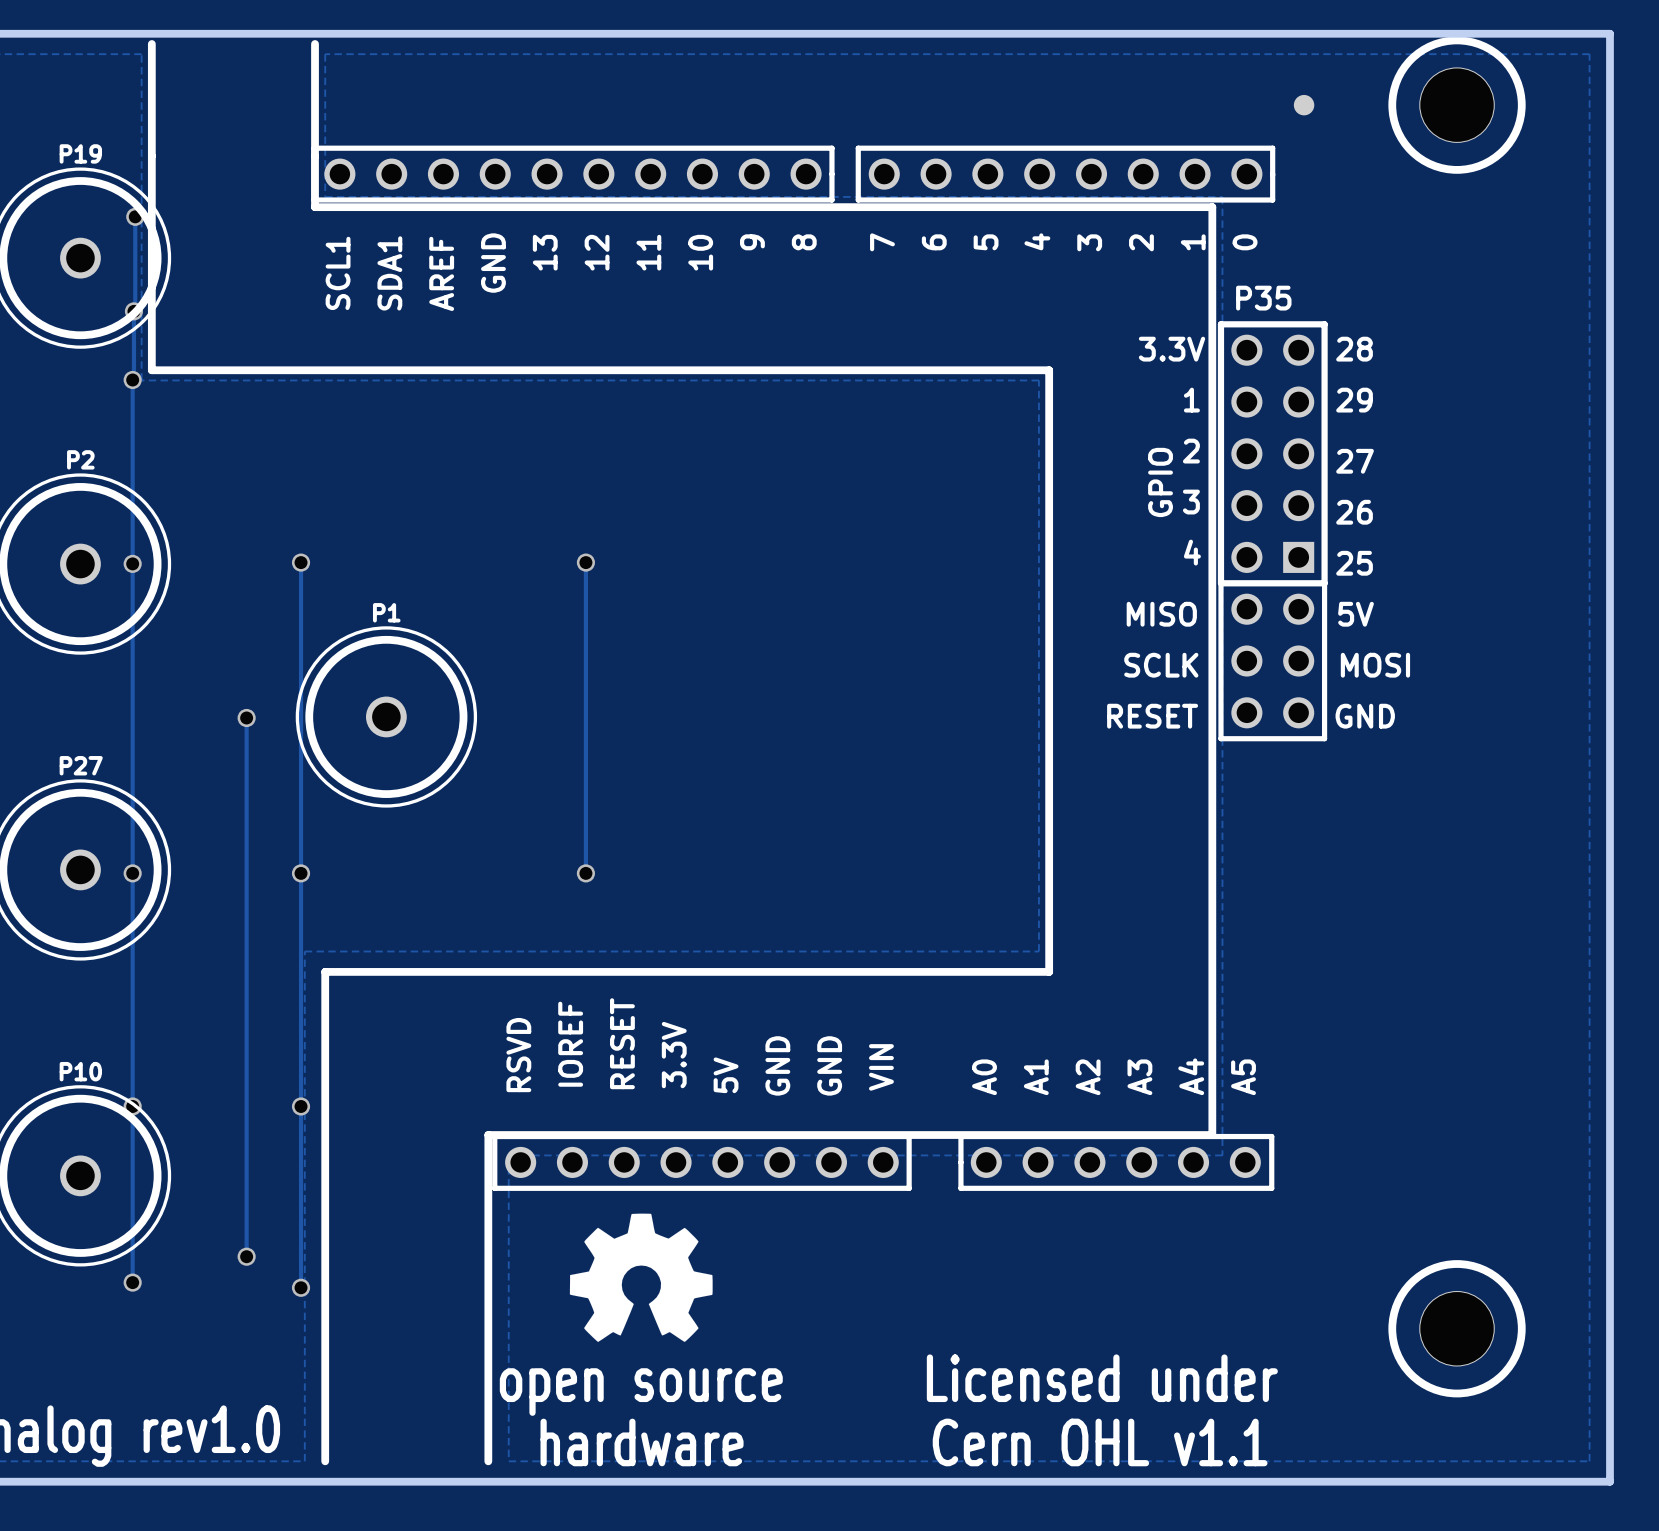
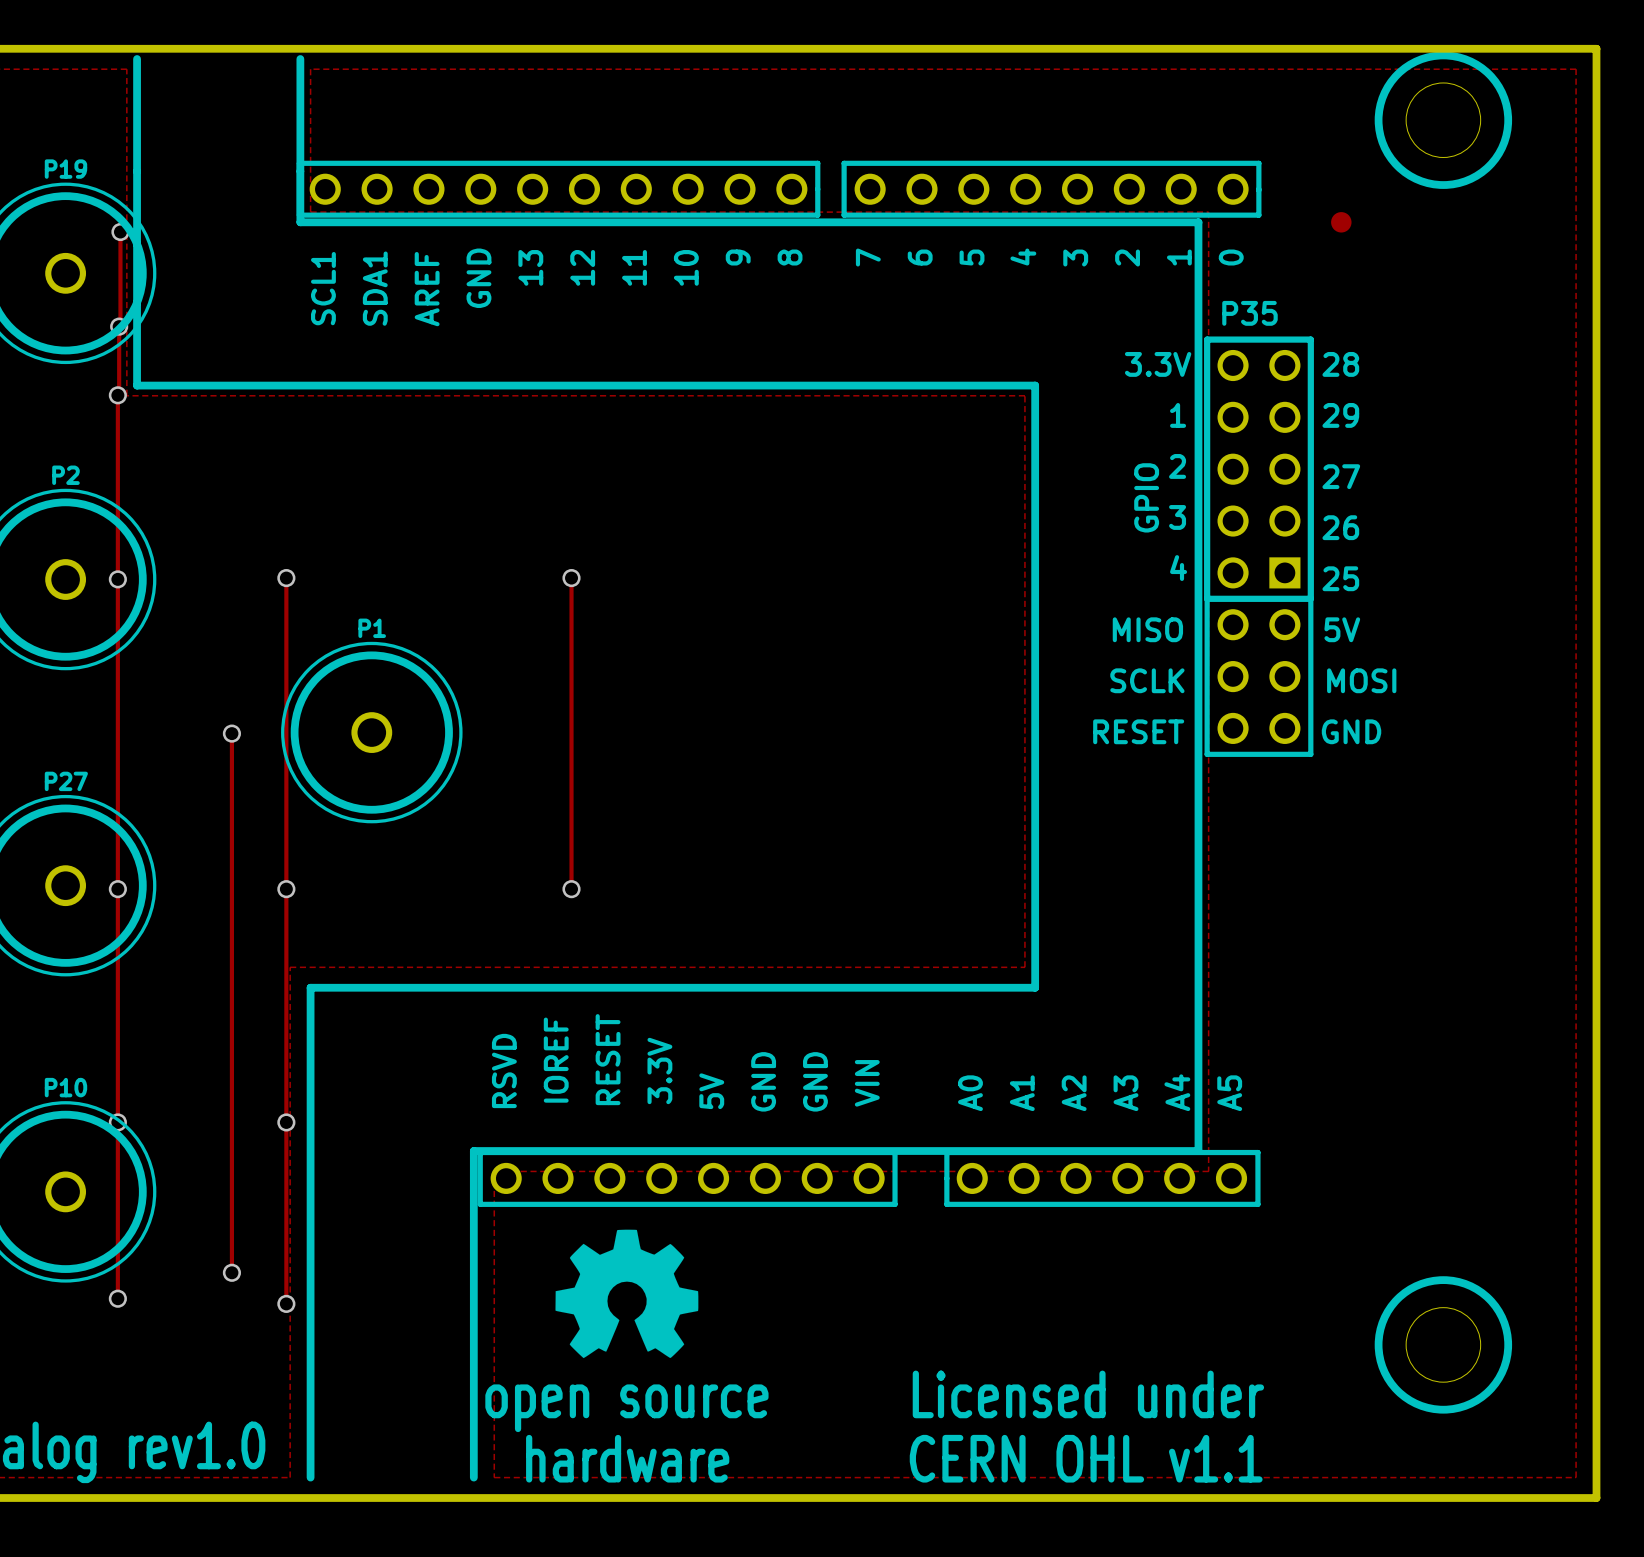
part position: (1304, 105) -> (1341, 222)
text: Cern OHL v1.1 (1100, 1442) -> CERN OHL v1.1 (1086, 1458)

